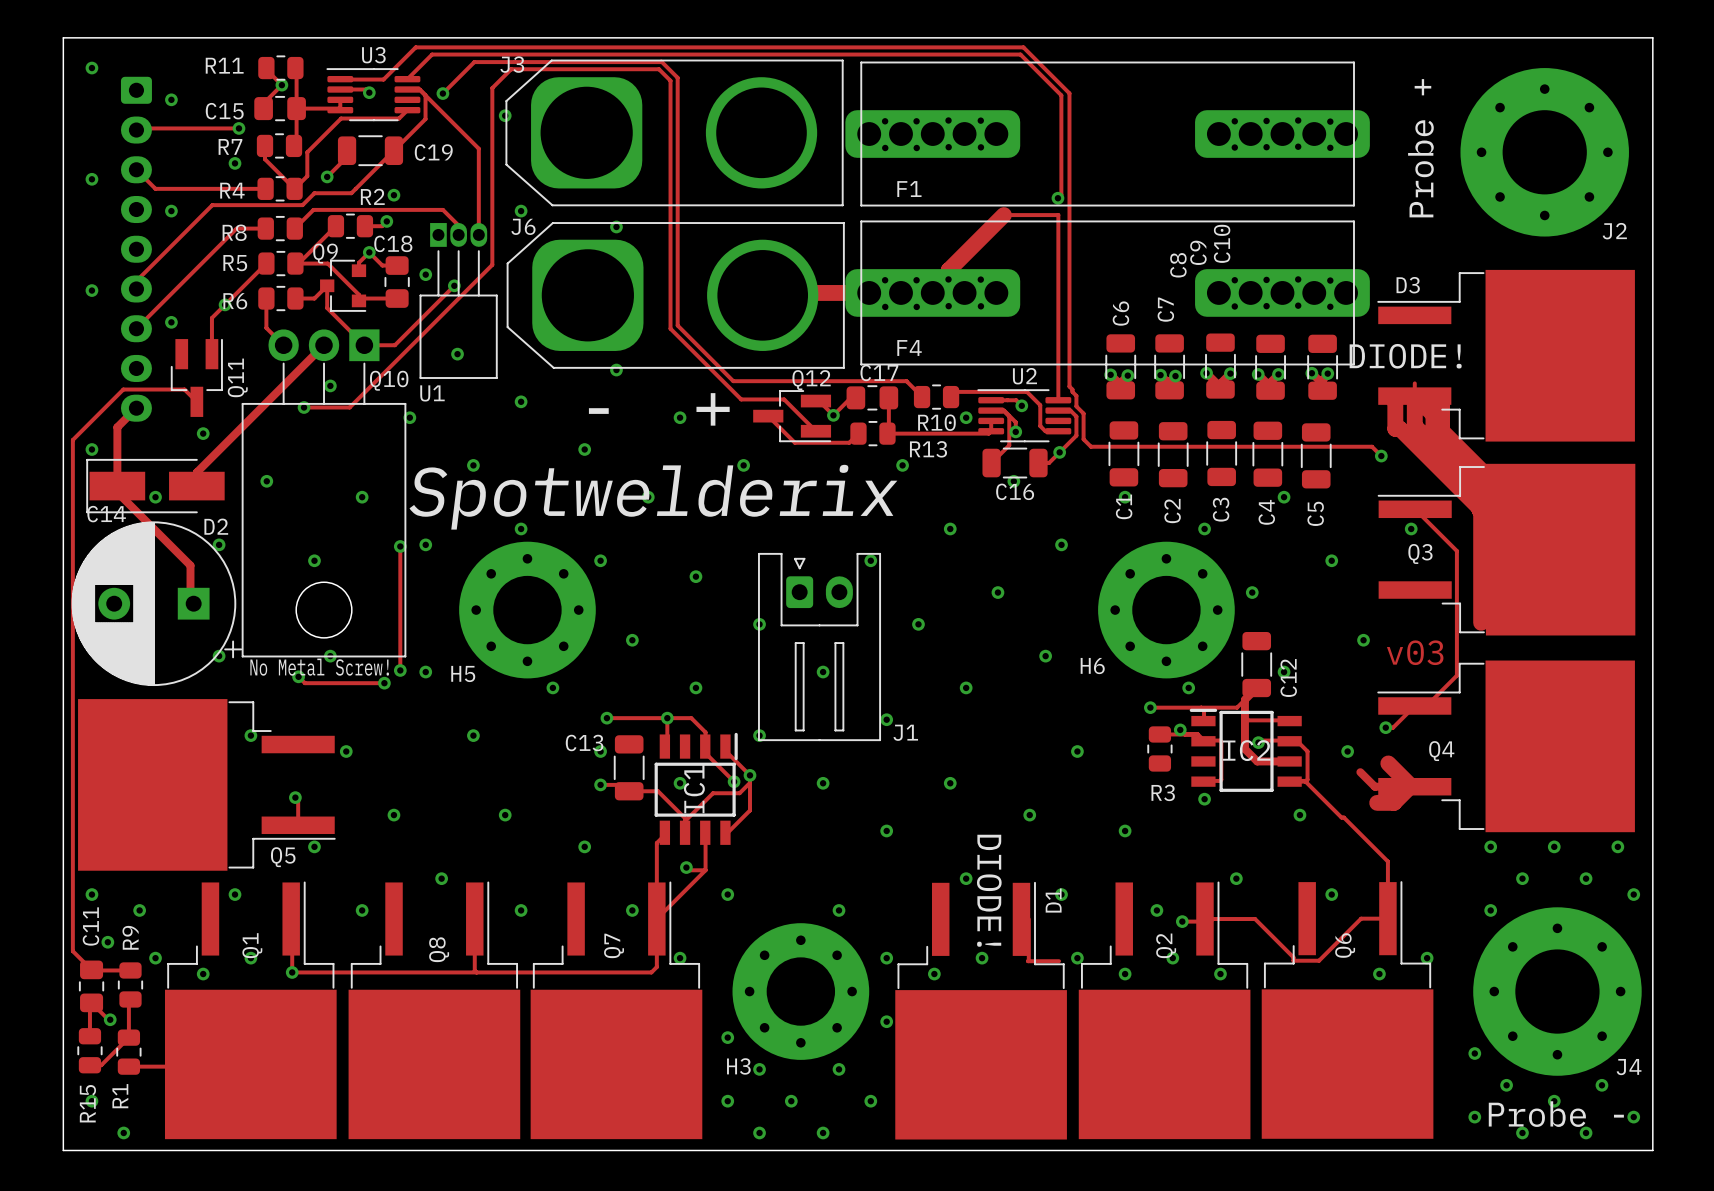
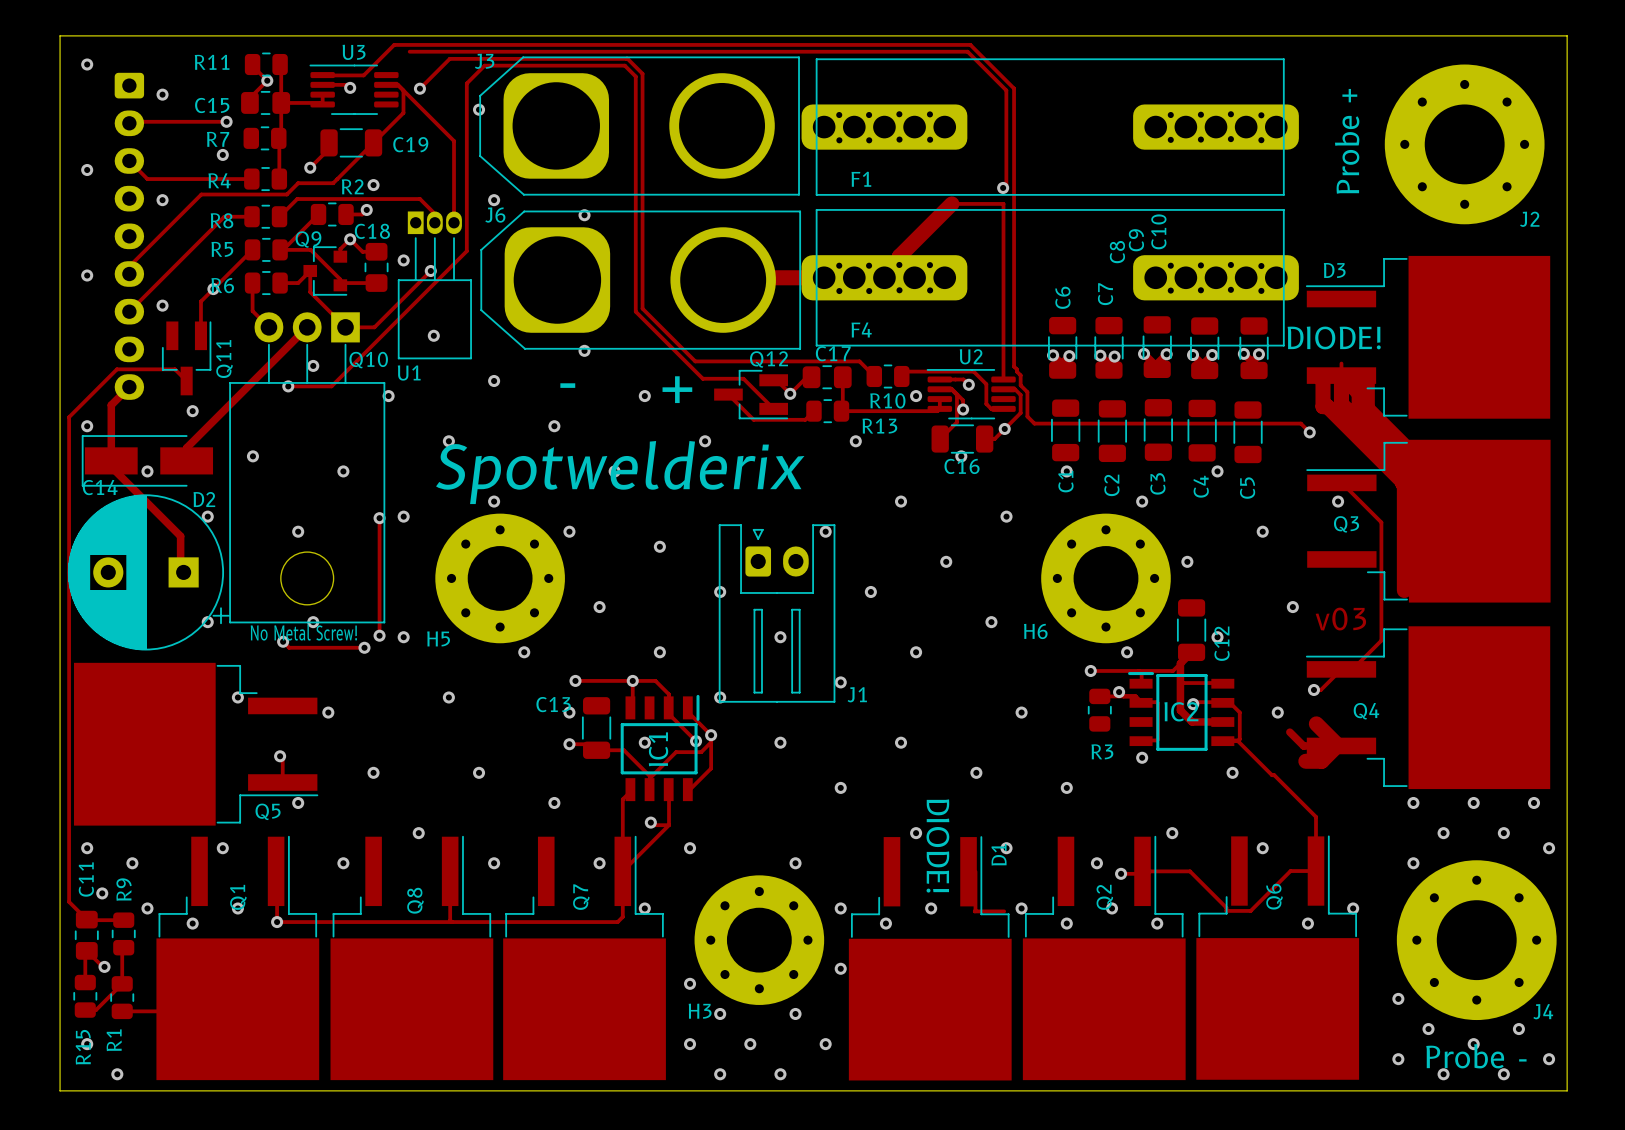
track: (432, 54) (407, 79) -> none
track: (407, 110) (399, 118) (341, 118) (307, 152) (307, 176) (294, 188) (265, 159) (265, 145) -> none
track: none -> (278, 138) (279, 179)

